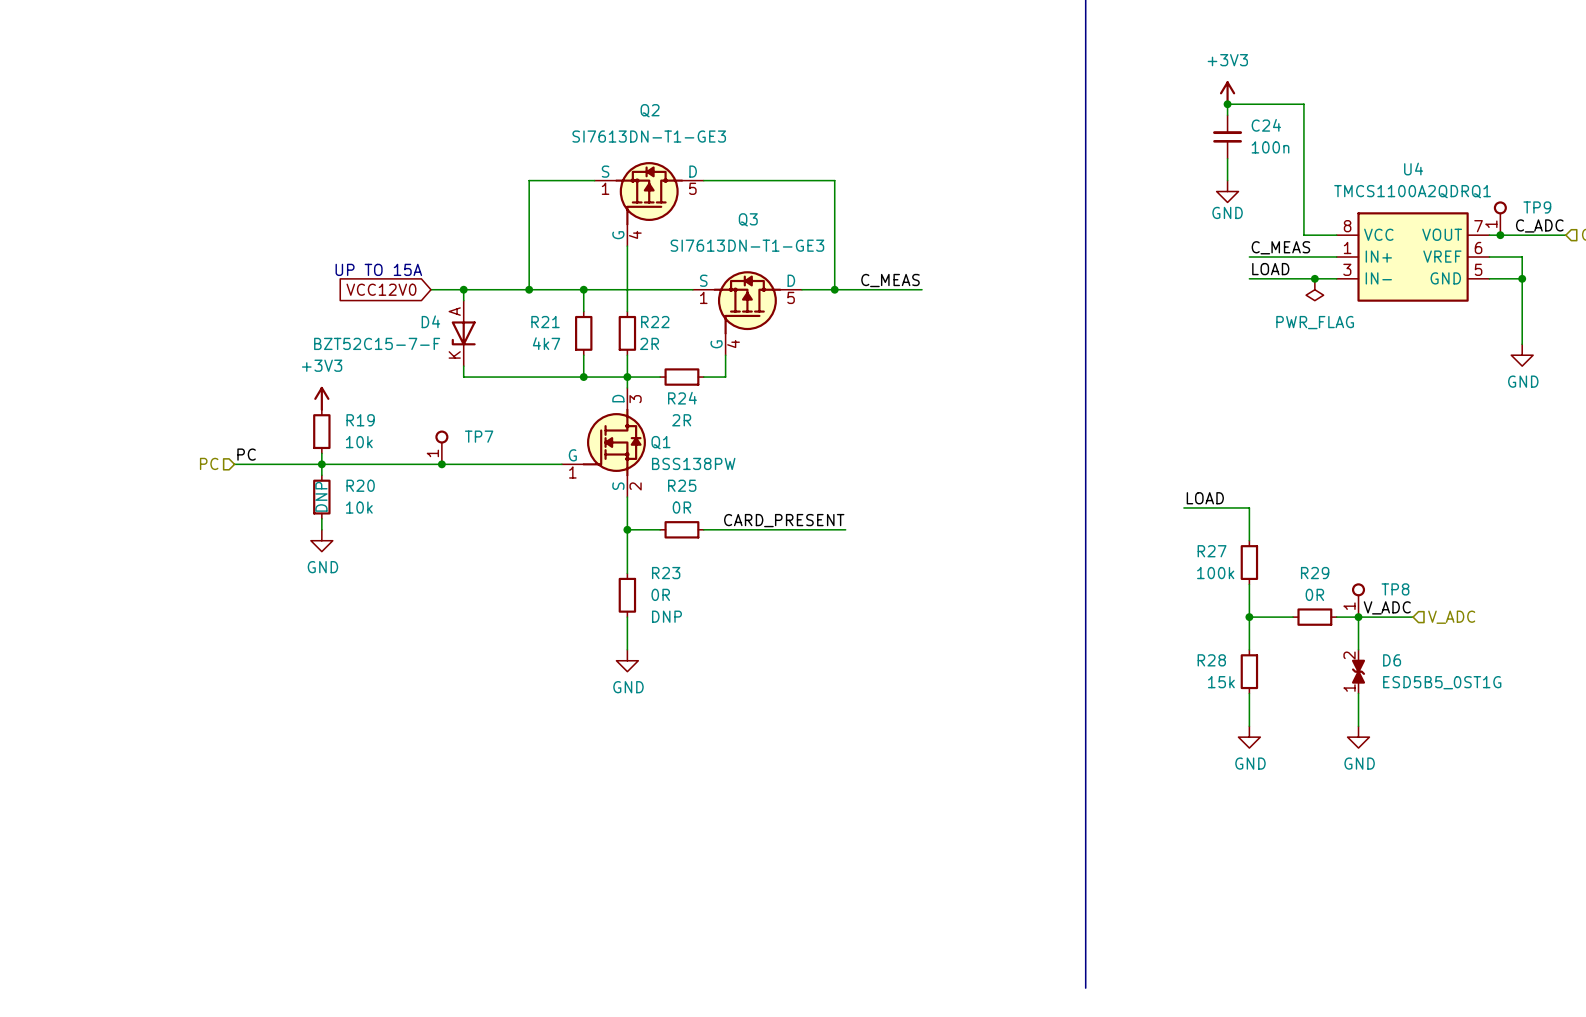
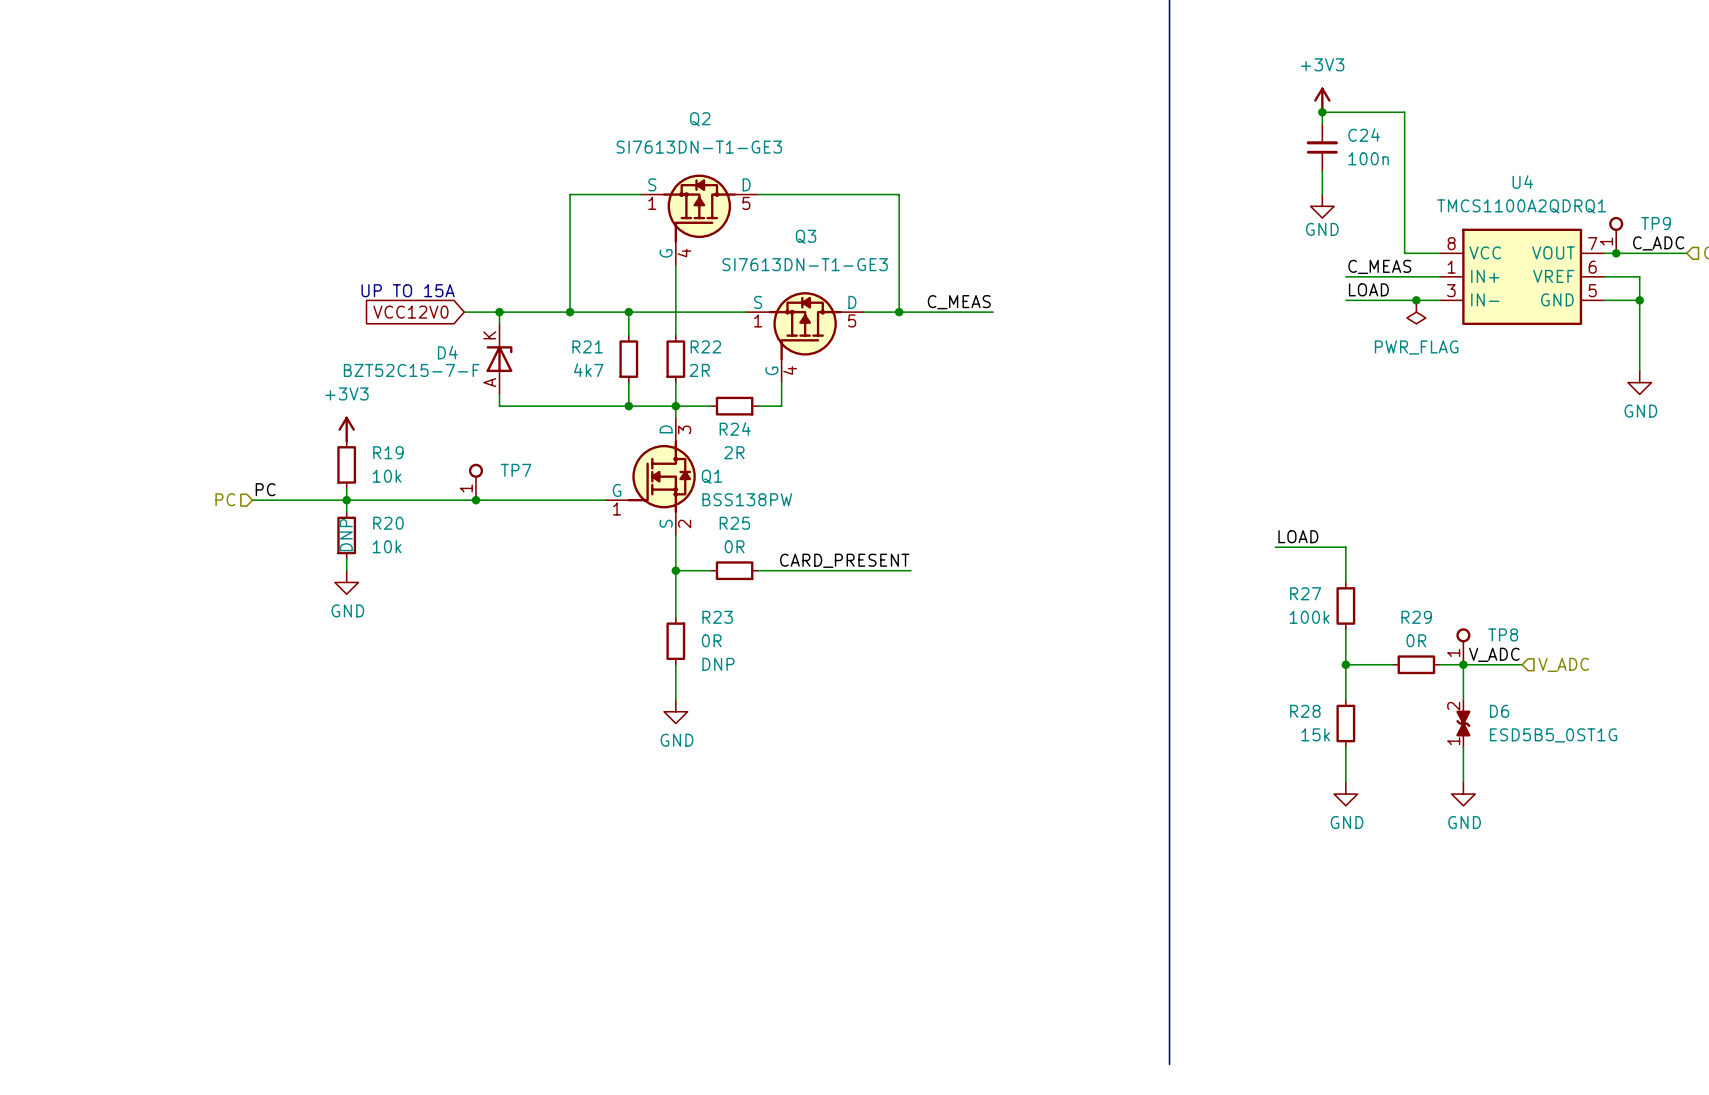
D4 rotation: 0° (463, 333) -> 180° (499, 359)

